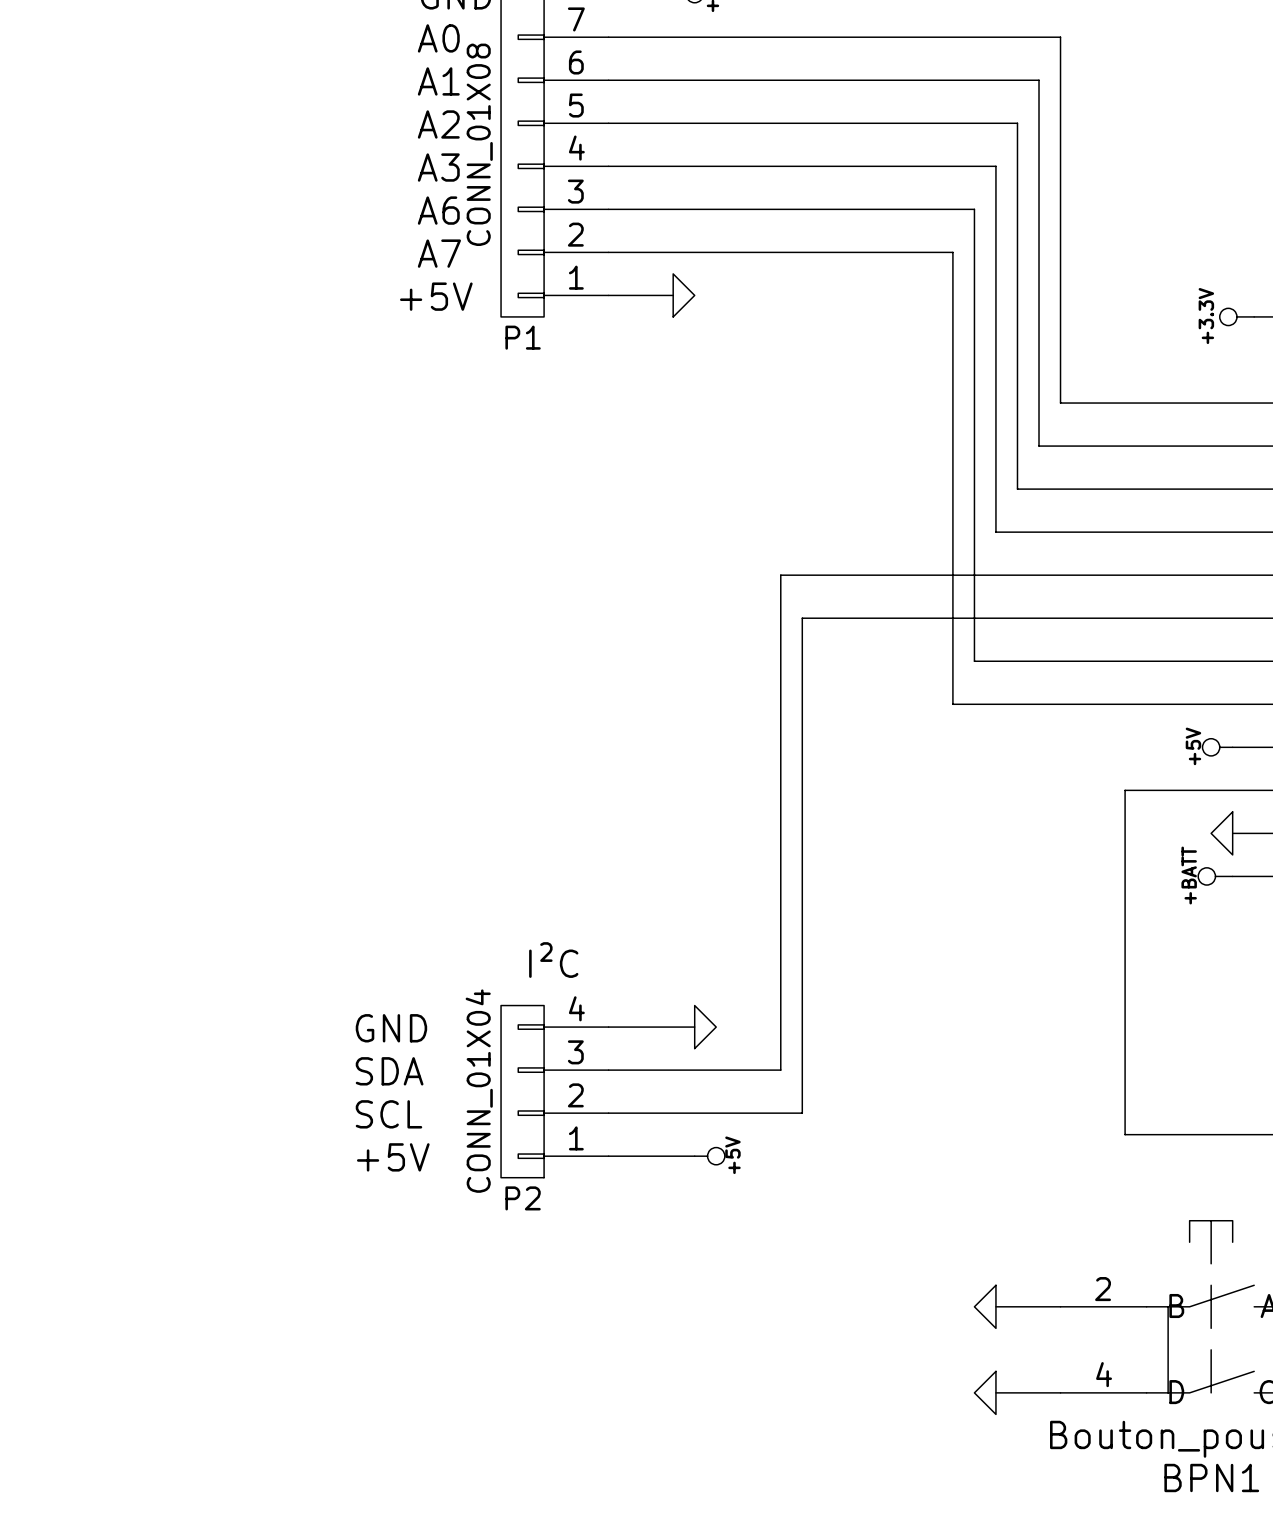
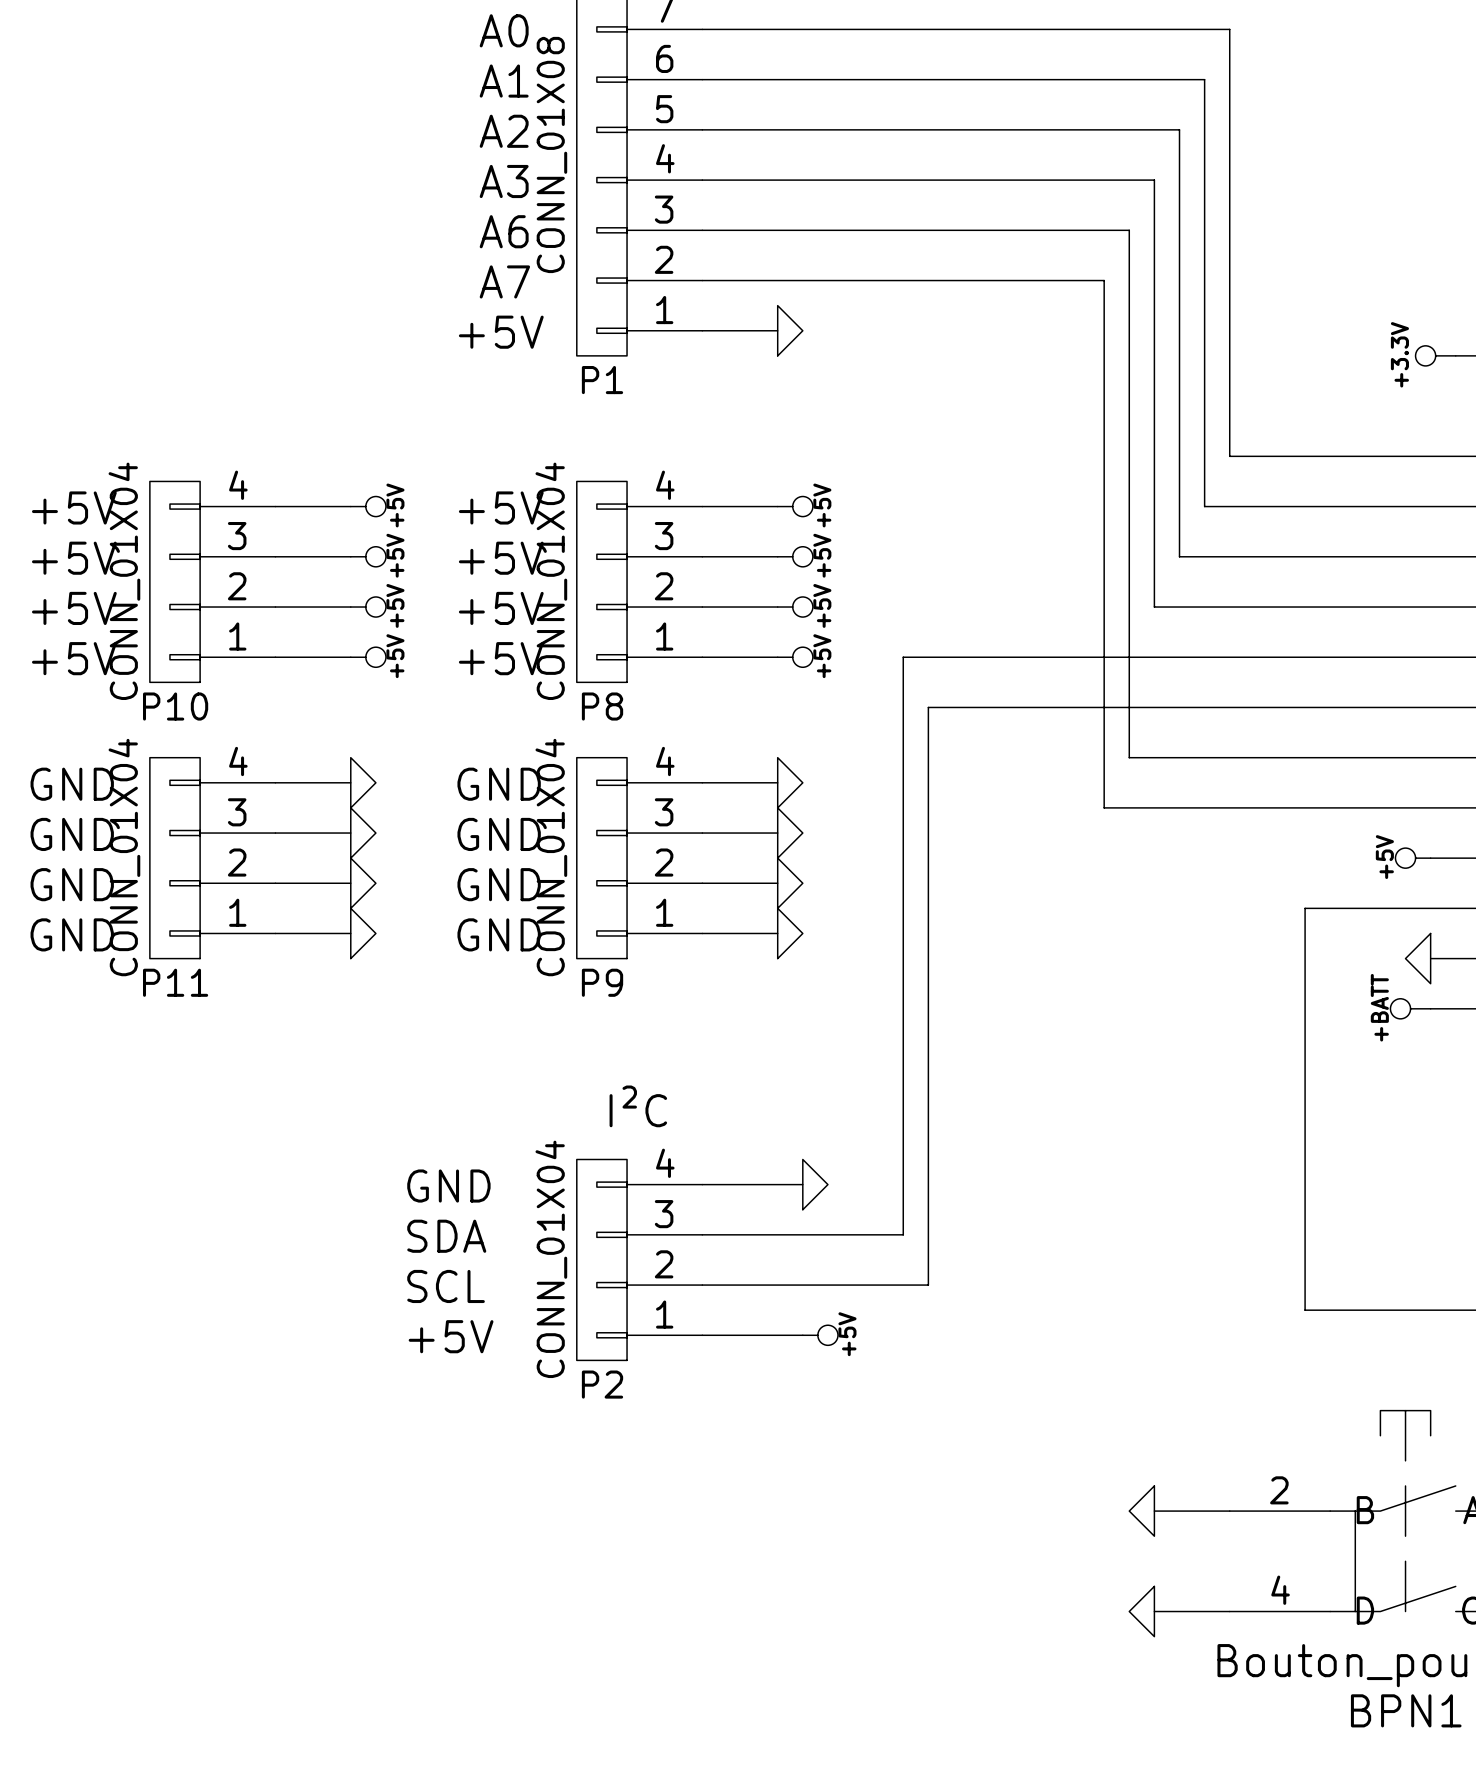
wire: none -> (275, 506) (350, 506)
power symbol: none -> +5V (368, 506)
wire: none -> (702, 506) (777, 506)
power symbol: none -> +5V (795, 506)
text: none -> +5V (74, 507)
text: none -> +5V (501, 507)
wire: none -> (275, 556) (350, 556)
power symbol: none -> +5V (368, 556)
wire: none -> (702, 556) (777, 556)
power symbol: none -> +5V (795, 556)
text: none -> +5V (74, 558)
text: none -> +5V (501, 558)
P10: none -> CONN_01X04 (212, 581)
P8: none -> CONN_01X04 (639, 581)
wire: none -> (275, 607) (350, 607)
power symbol: none -> +5V (368, 607)
wire: none -> (702, 607) (777, 607)
power symbol: none -> +5V (795, 607)
text: none -> +5V (74, 608)
text: none -> +5V (501, 608)
wire: none -> (275, 657) (350, 657)
power symbol: none -> +5V (368, 657)
wire: none -> (702, 657) (777, 657)
power symbol: none -> +5V (795, 657)
text: none -> +5V (74, 658)
text: none -> +5V (501, 658)
wire: none -> (275, 782) (350, 782)
power symbol: none -> (363, 782)
wire: none -> (702, 782) (777, 782)
power symbol: none -> (790, 782)
text: none -> GND (72, 784)
text: none -> GND (499, 784)
wire: none -> (275, 833) (350, 833)
power symbol: none -> (363, 833)
wire: none -> (702, 833) (777, 833)
power symbol: none -> (790, 833)
text: none -> GND (72, 834)
text: none -> GND (499, 834)
P11: none -> CONN_01X04 (212, 858)
P9: none -> CONN_01X04 (639, 858)
wire: none -> (275, 883) (350, 883)
power symbol: none -> (363, 883)
wire: none -> (702, 883) (777, 883)
power symbol: none -> (790, 883)
text: none -> GND (72, 884)
text: none -> GND (499, 884)
wire: none -> (275, 933) (350, 933)
power symbol: none -> (363, 933)
wire: none -> (702, 933) (777, 933)
power symbol: none -> (790, 933)
text: none -> GND (72, 934)
text: none -> GND (499, 934)

